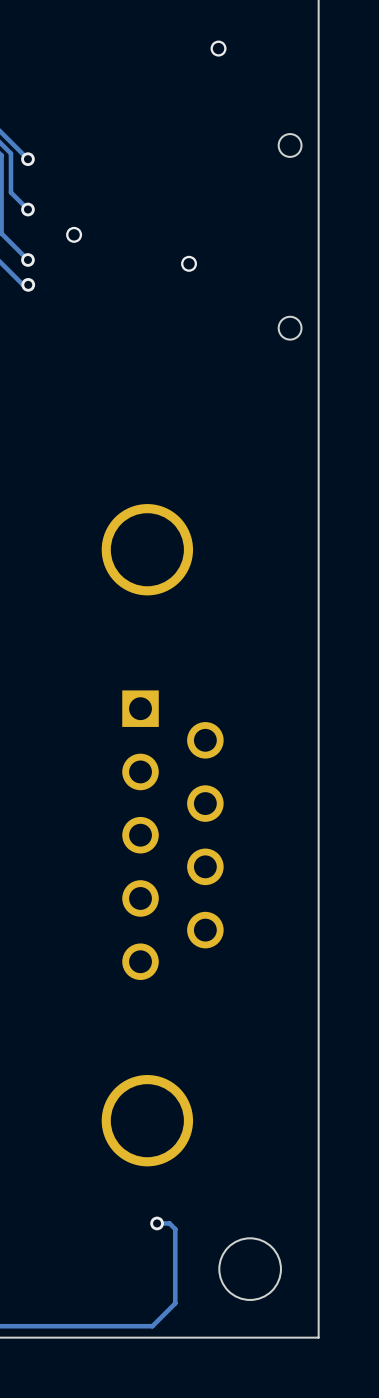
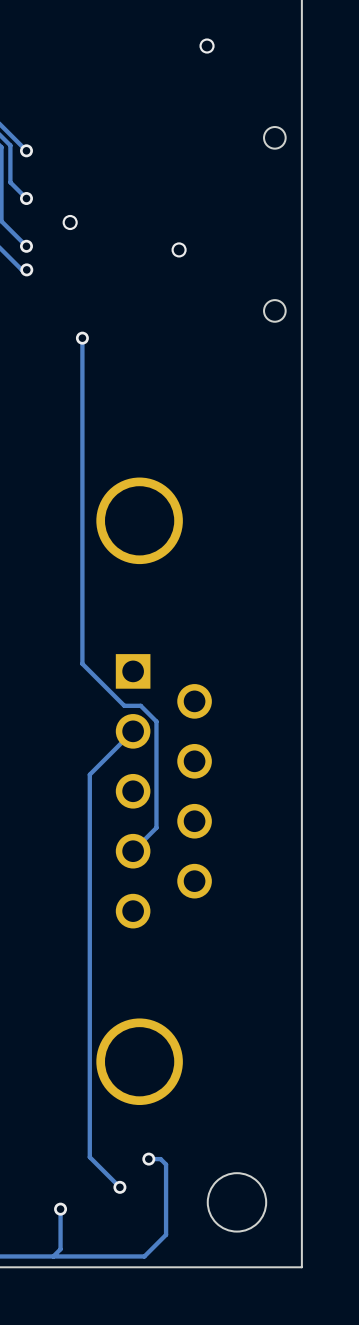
track: none -> (82, 338) (82, 663) (124, 705) (140, 705) (156, 721) (156, 827) (133, 851)
via: none -> (82, 338)
track: none -> (133, 731) (89, 774) (89, 1157) (119, 1187)
via: none -> (119, 1187)
track: none -> (60, 1209) (60, 1249) (53, 1256)
via: none -> (60, 1209)

